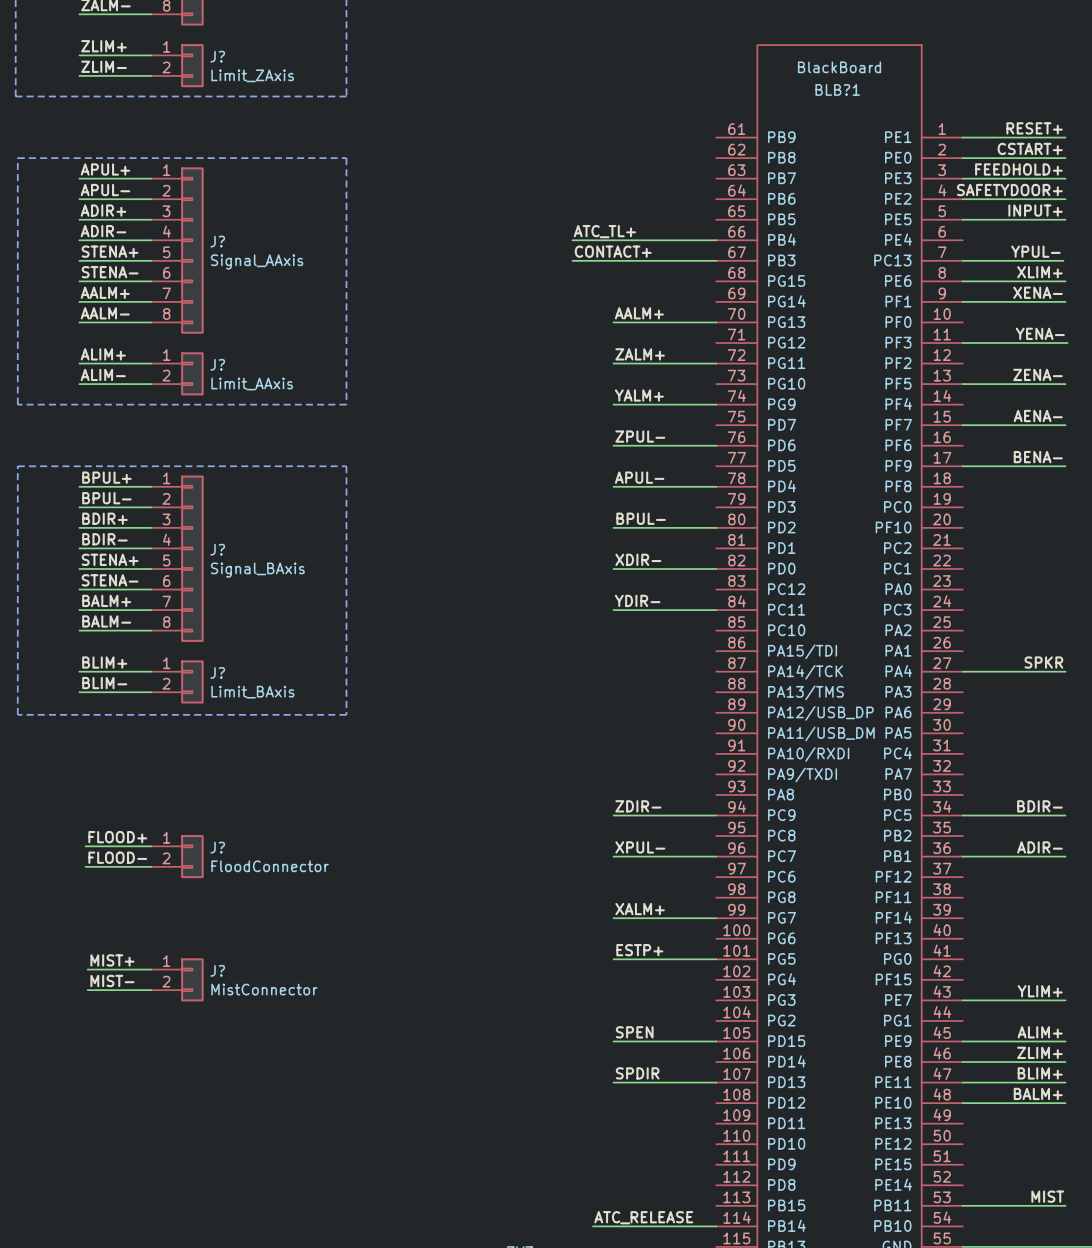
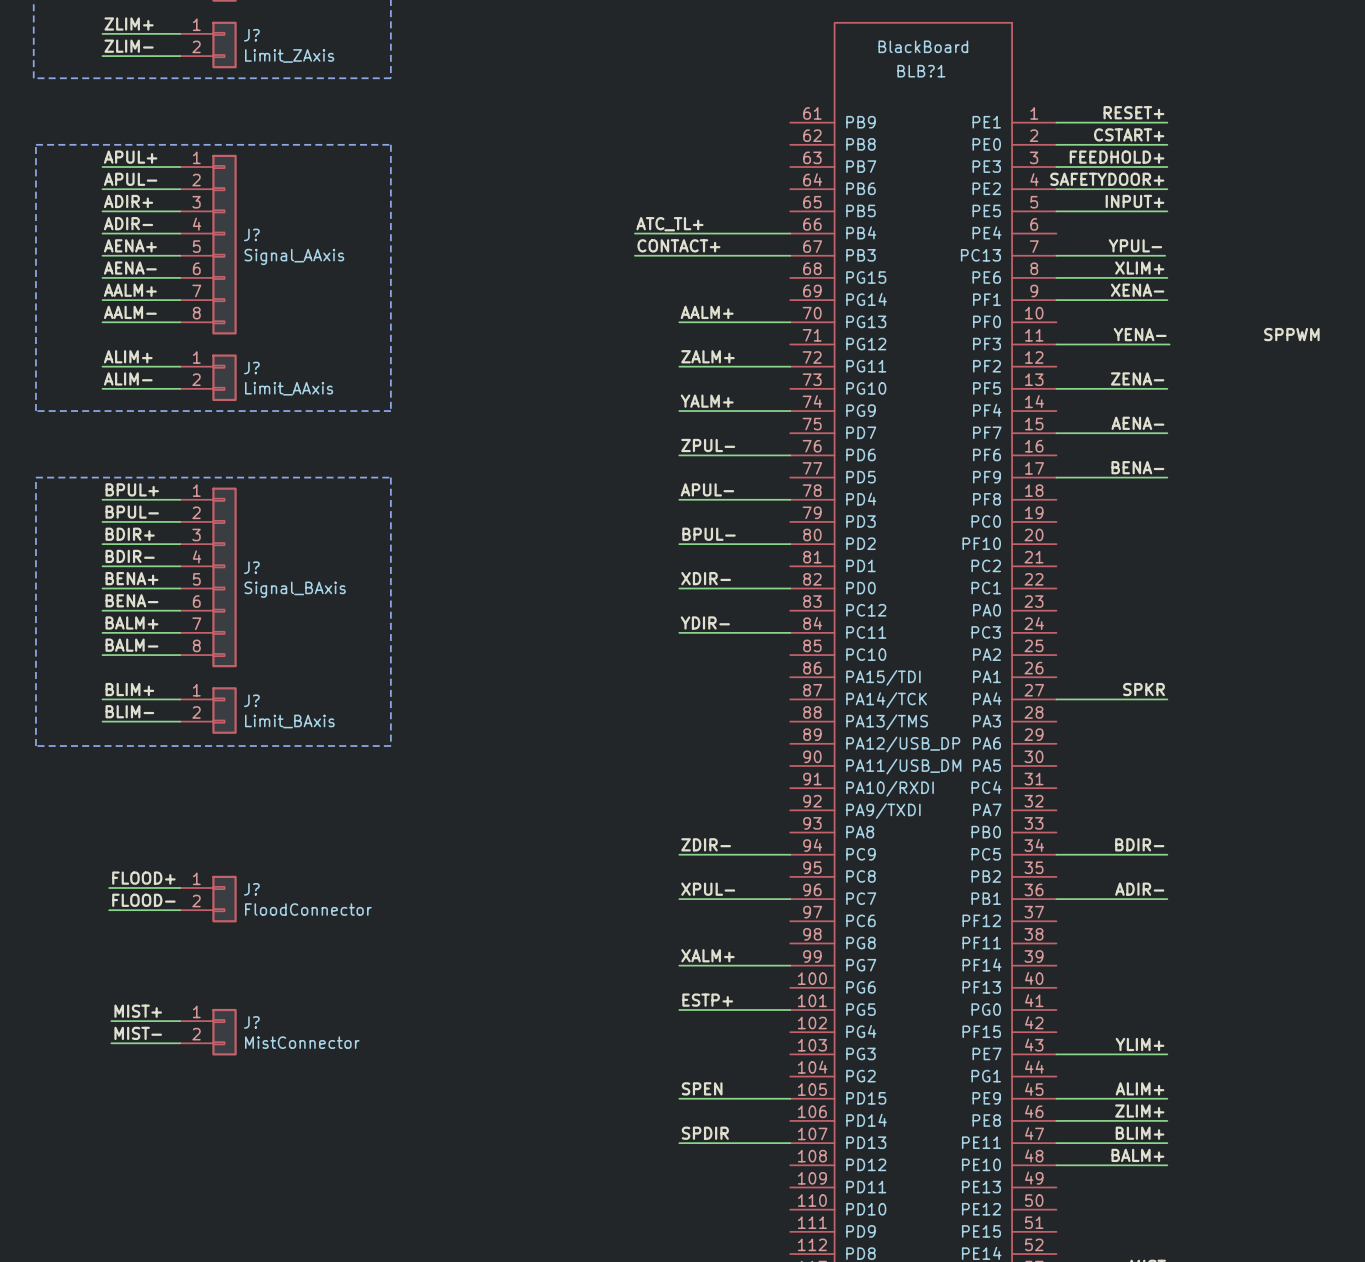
label: STENA+ (110, 251) -> AENA+ (130, 245)
label: STENA- (110, 272) -> AENA- (130, 268)
label: STENA+ (110, 559) -> BENA+ (131, 578)
label: STENA- (110, 580) -> BENA- (131, 600)

